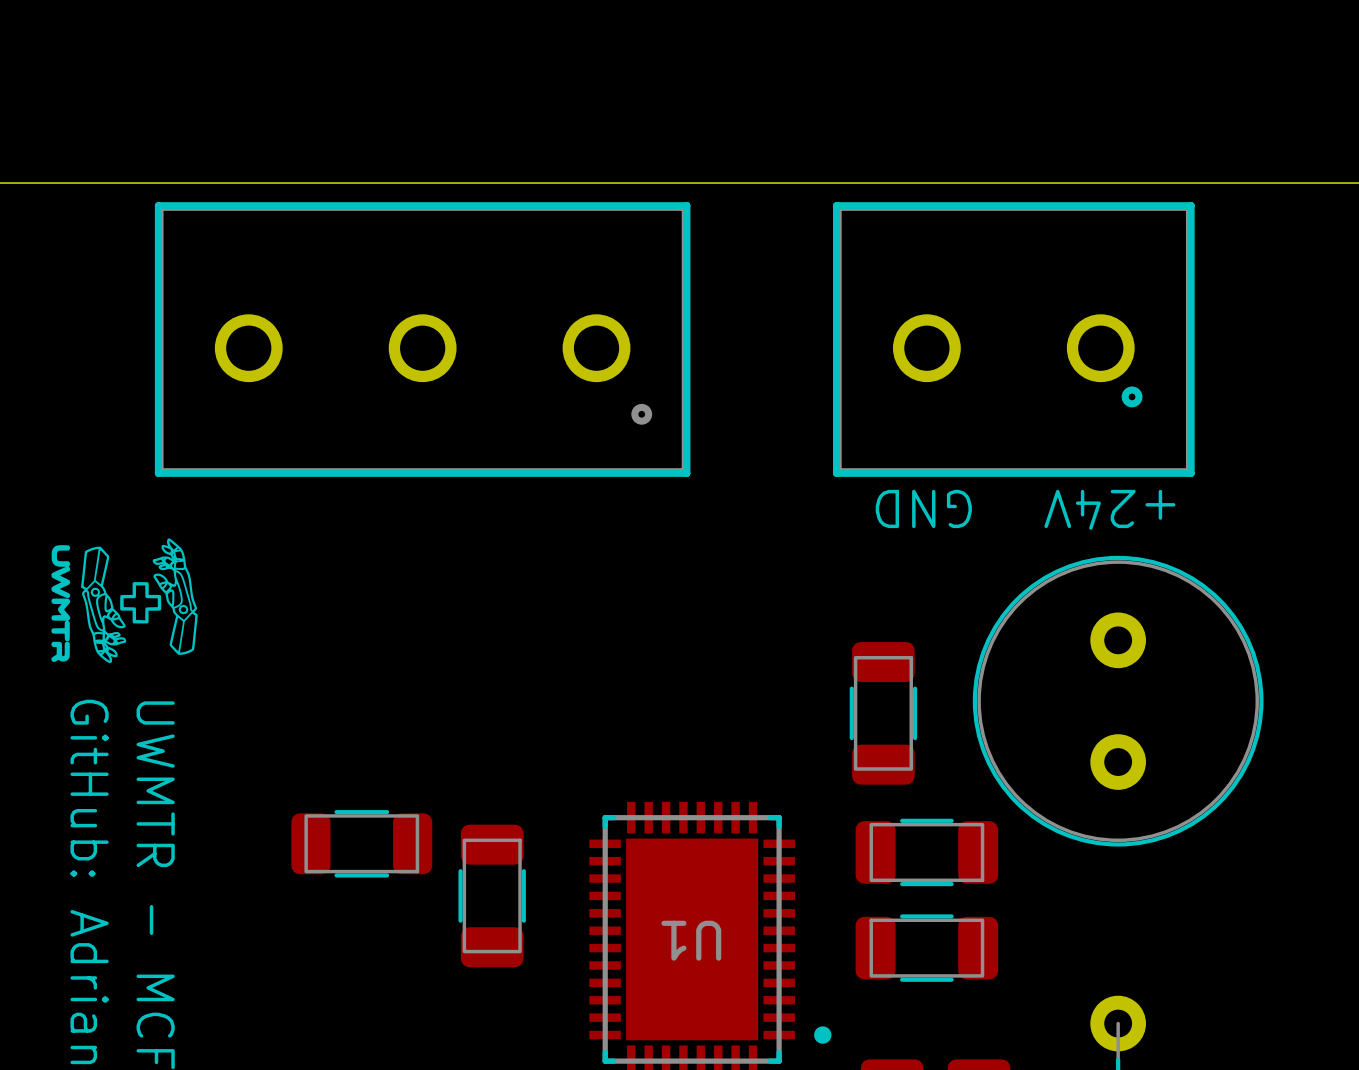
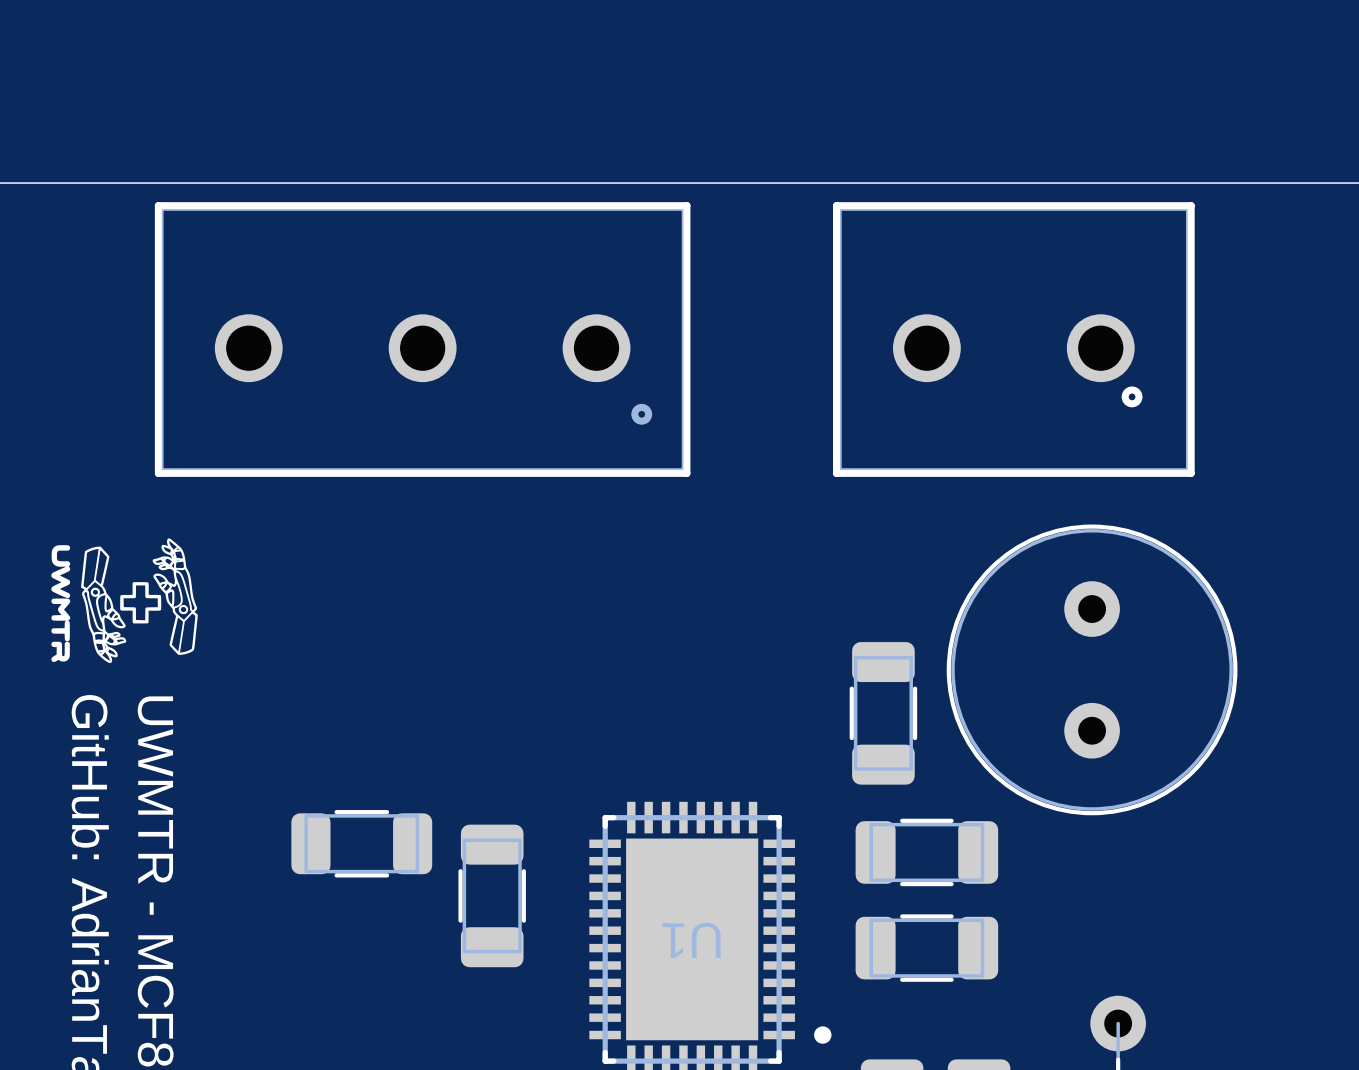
text: GND (923, 508) -> none
text: +24V (1109, 509) -> none
part position: (1118, 701) -> (1092, 669)

